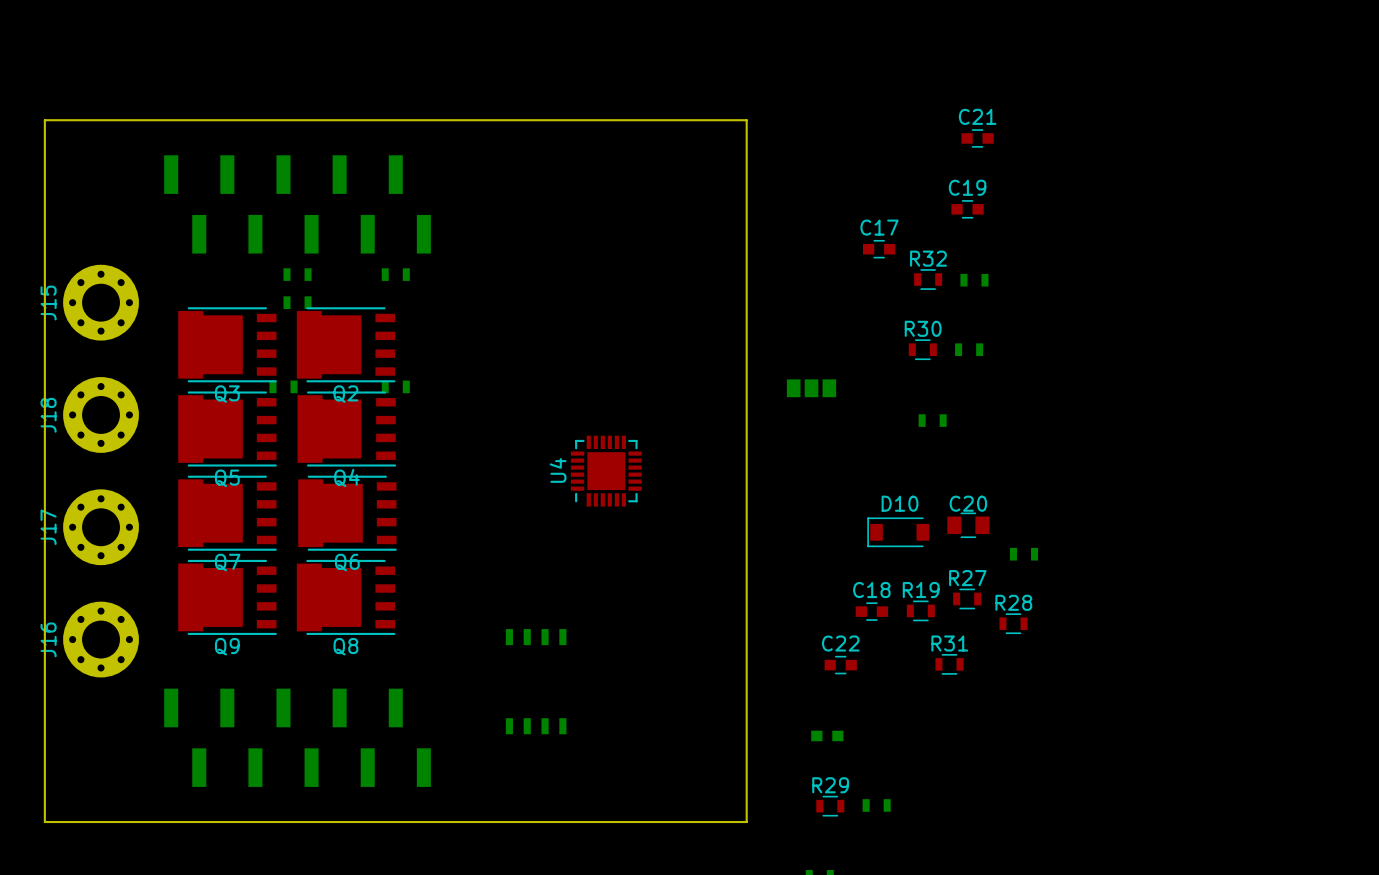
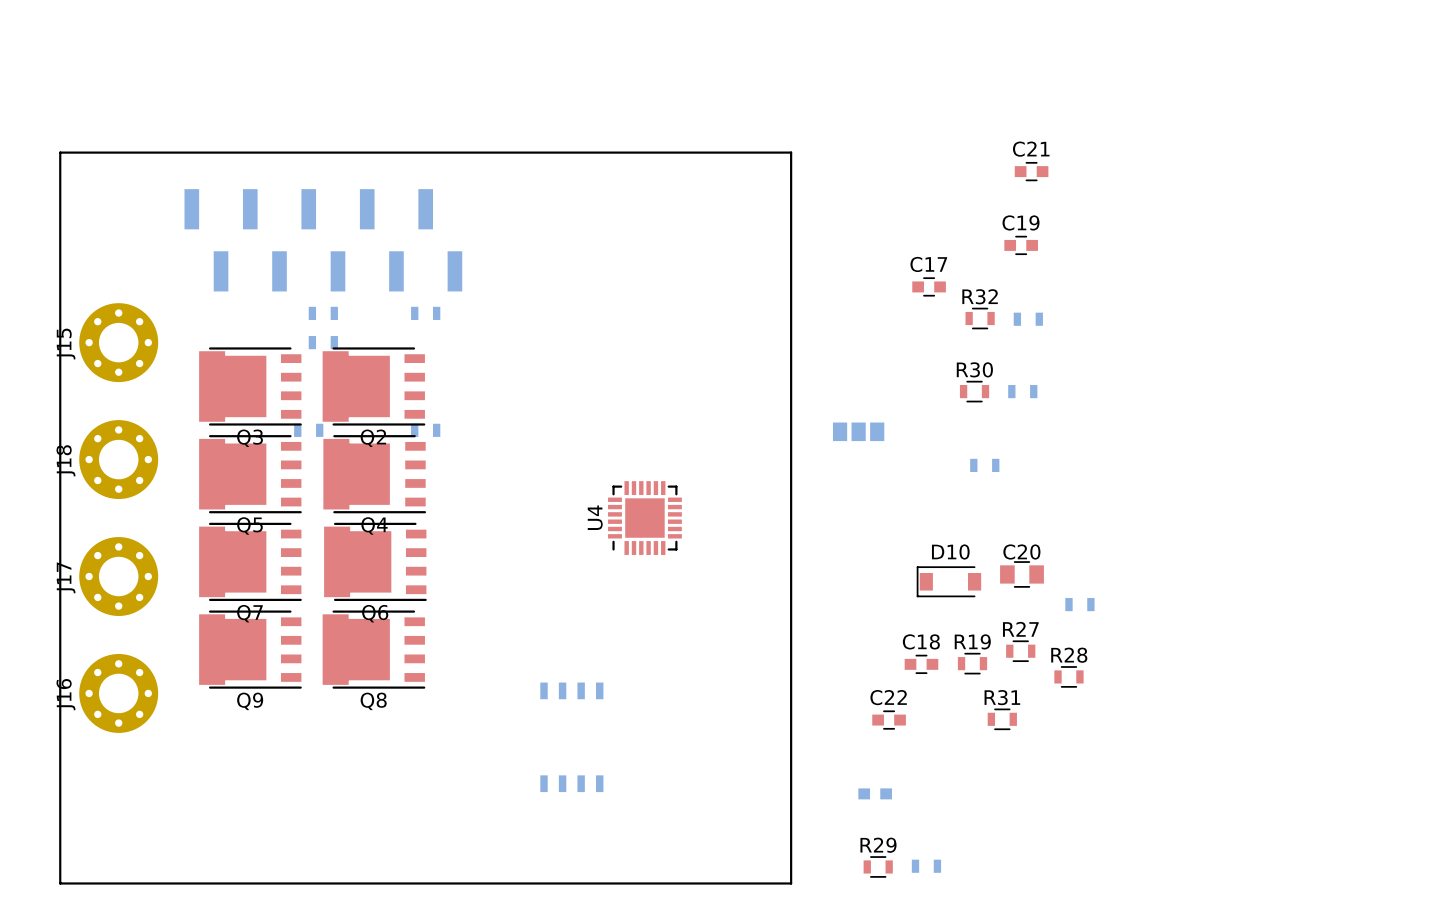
part: (297, 737) -> none

